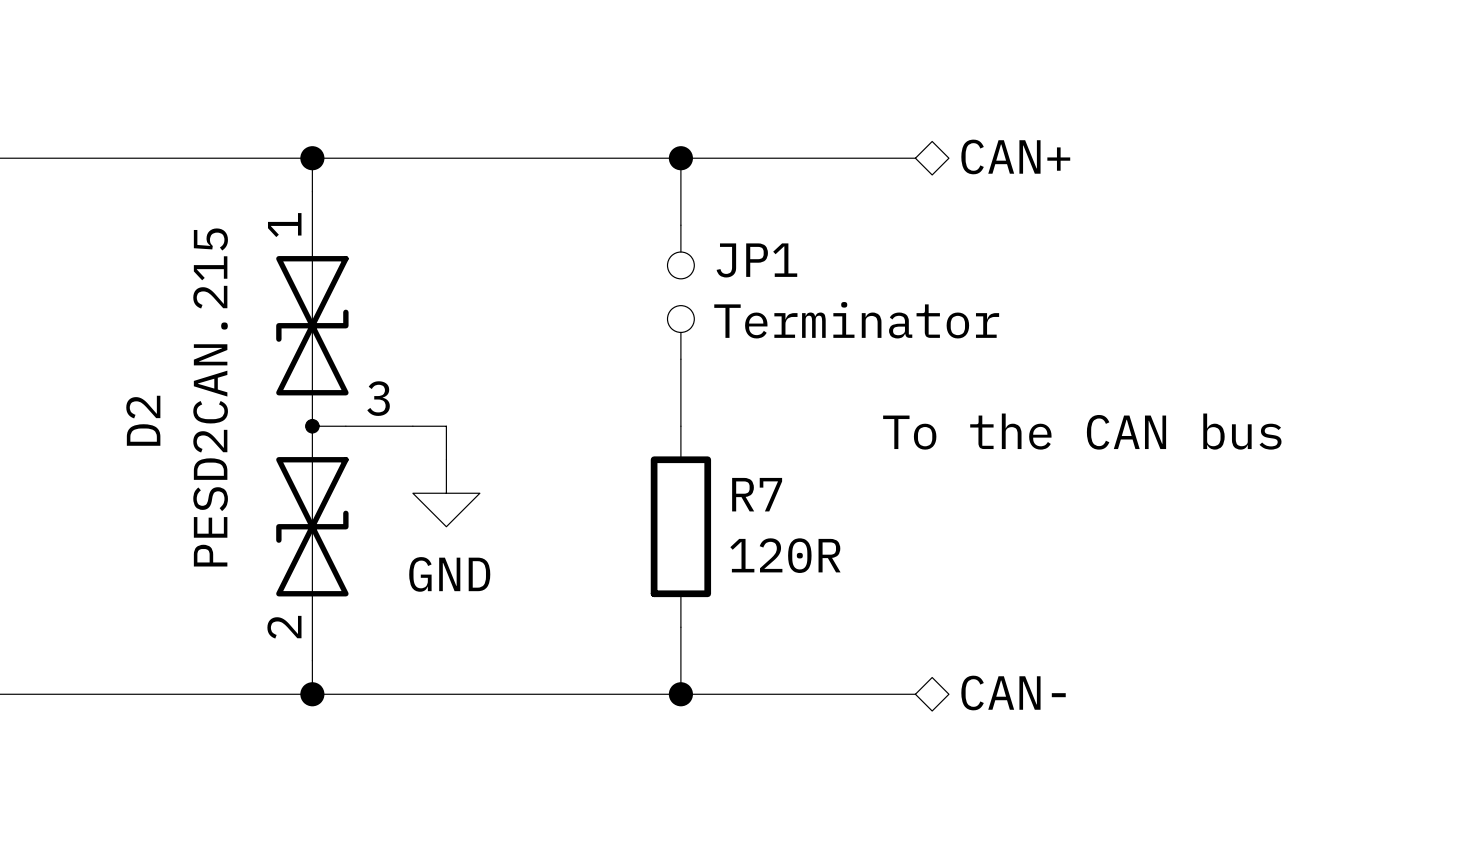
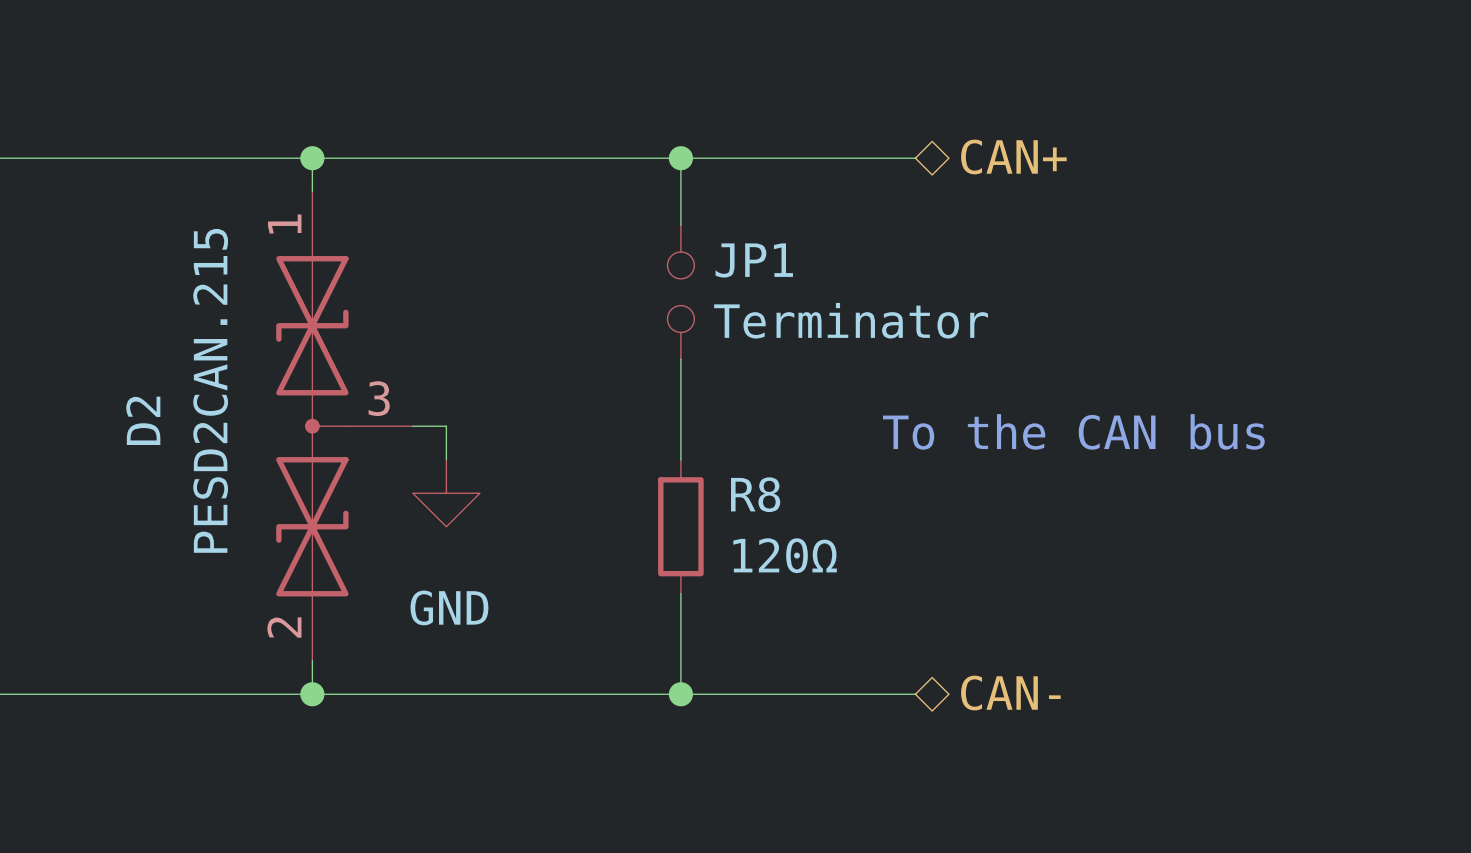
R7: 120R (680, 526) -> none
R8: none -> 120Ω (680, 526)
power symbol text position: GND (449, 574) -> GND (449, 607)

